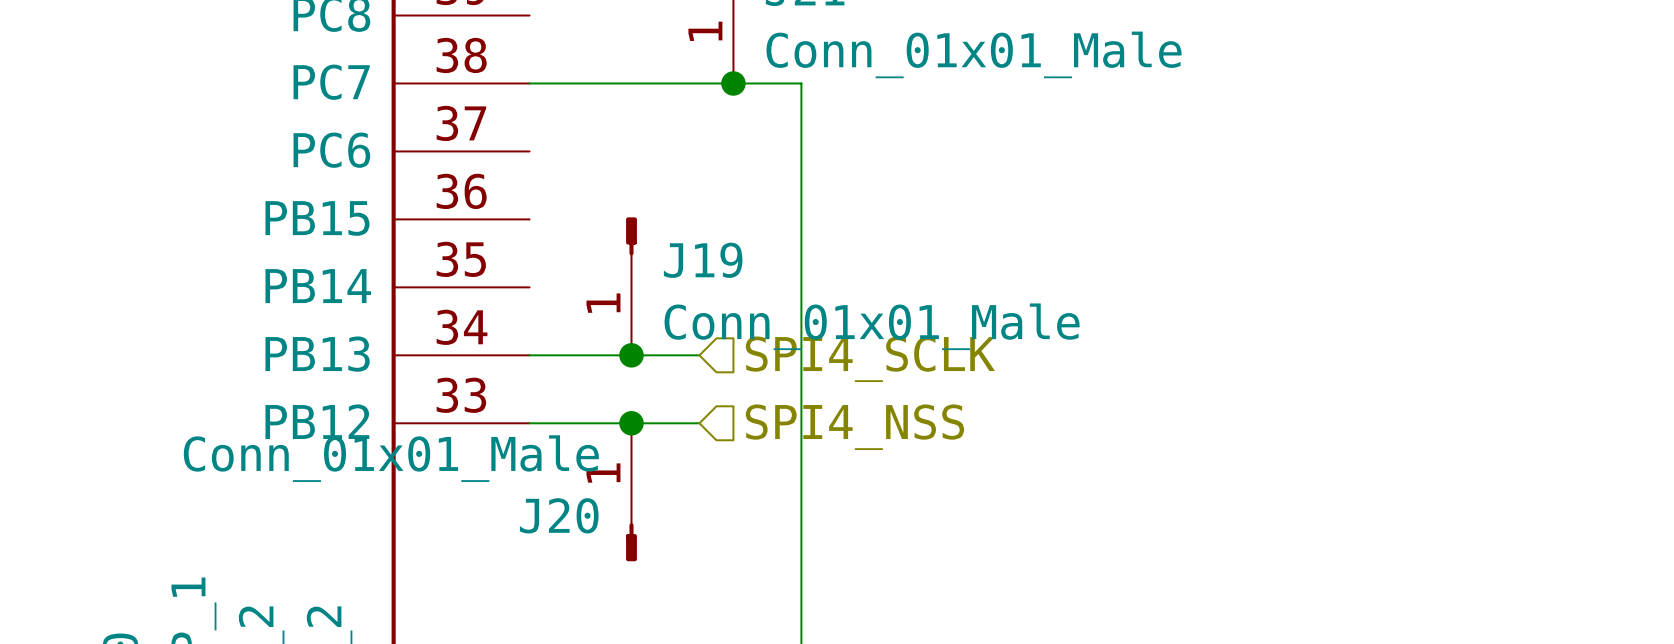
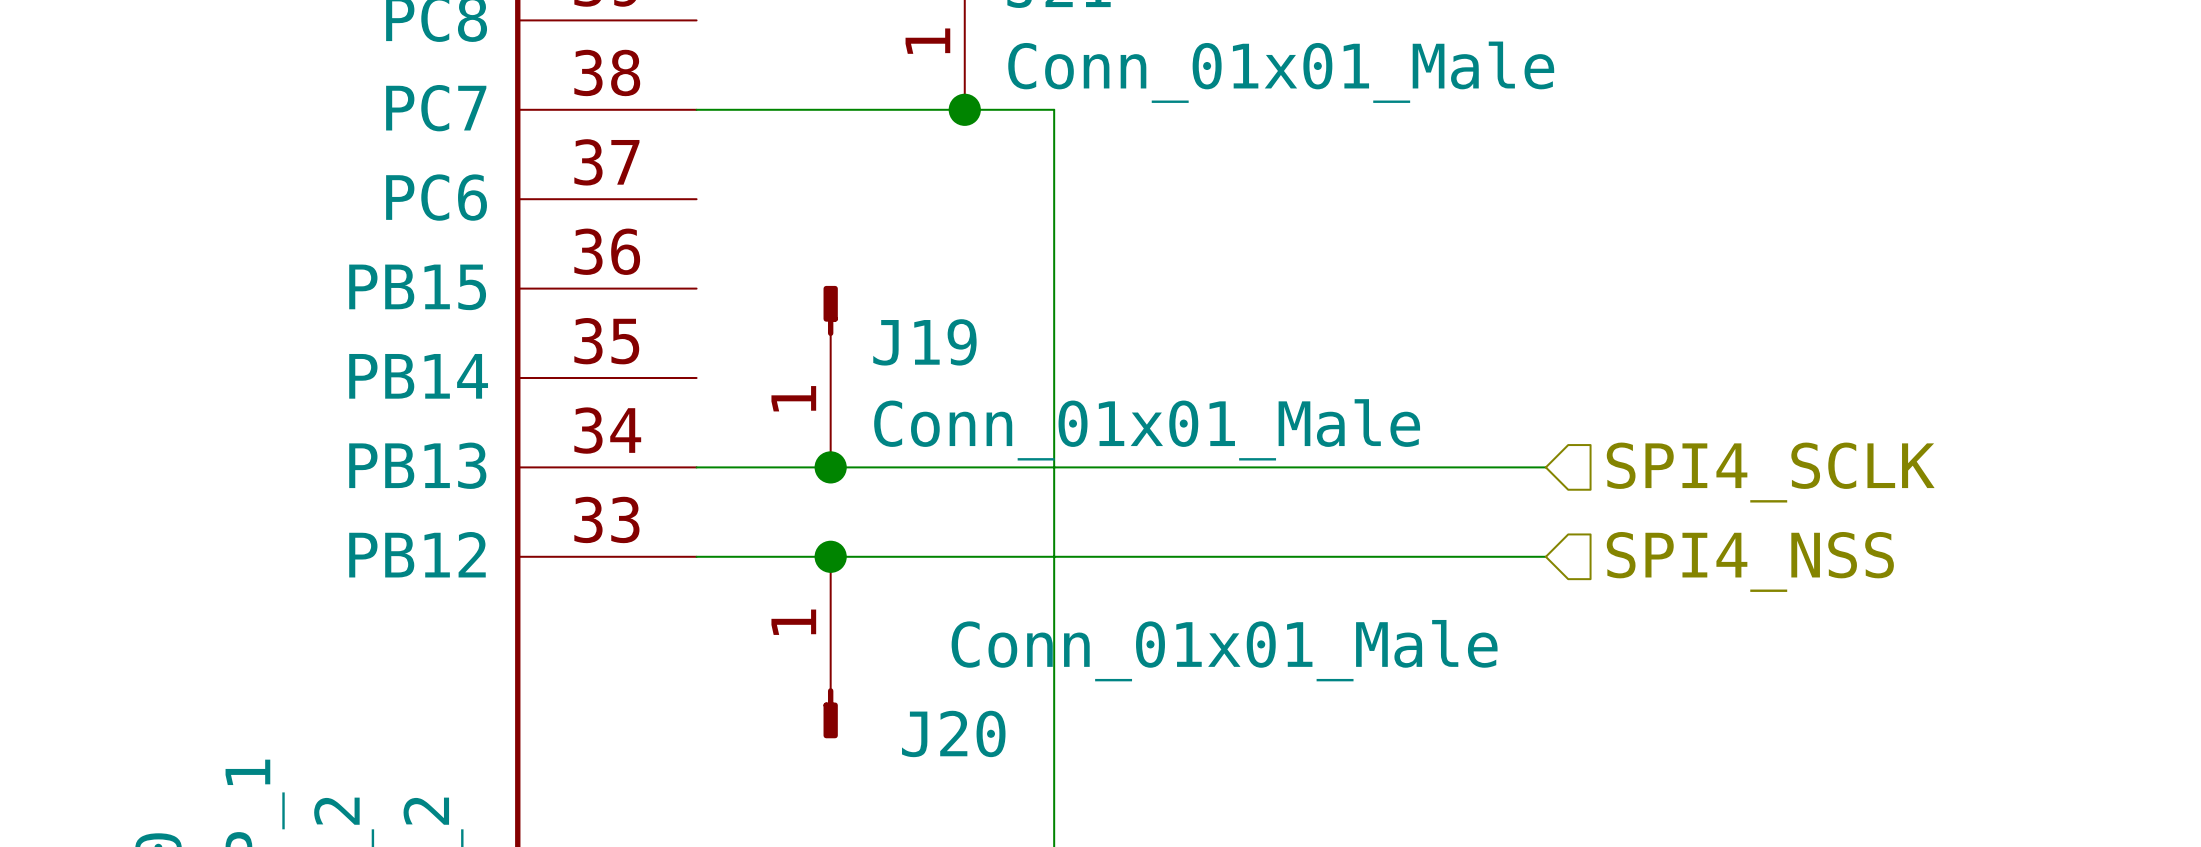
wire: none -> (920, 467) (1545, 467)
hierarchical label position: SPI4_SCLK (870, 359) -> SPI4_SCLK (1770, 472)
wire: none -> (920, 556) (1545, 556)
hierarchical label position: SPI4_NSS (854, 427) -> SPI4_NSS (1750, 561)
J20 value position: Conn_01x01_Male (391, 458) -> Conn_01x01_Male (1224, 650)
J20 name position: J20 (559, 515) -> J20 (953, 733)

